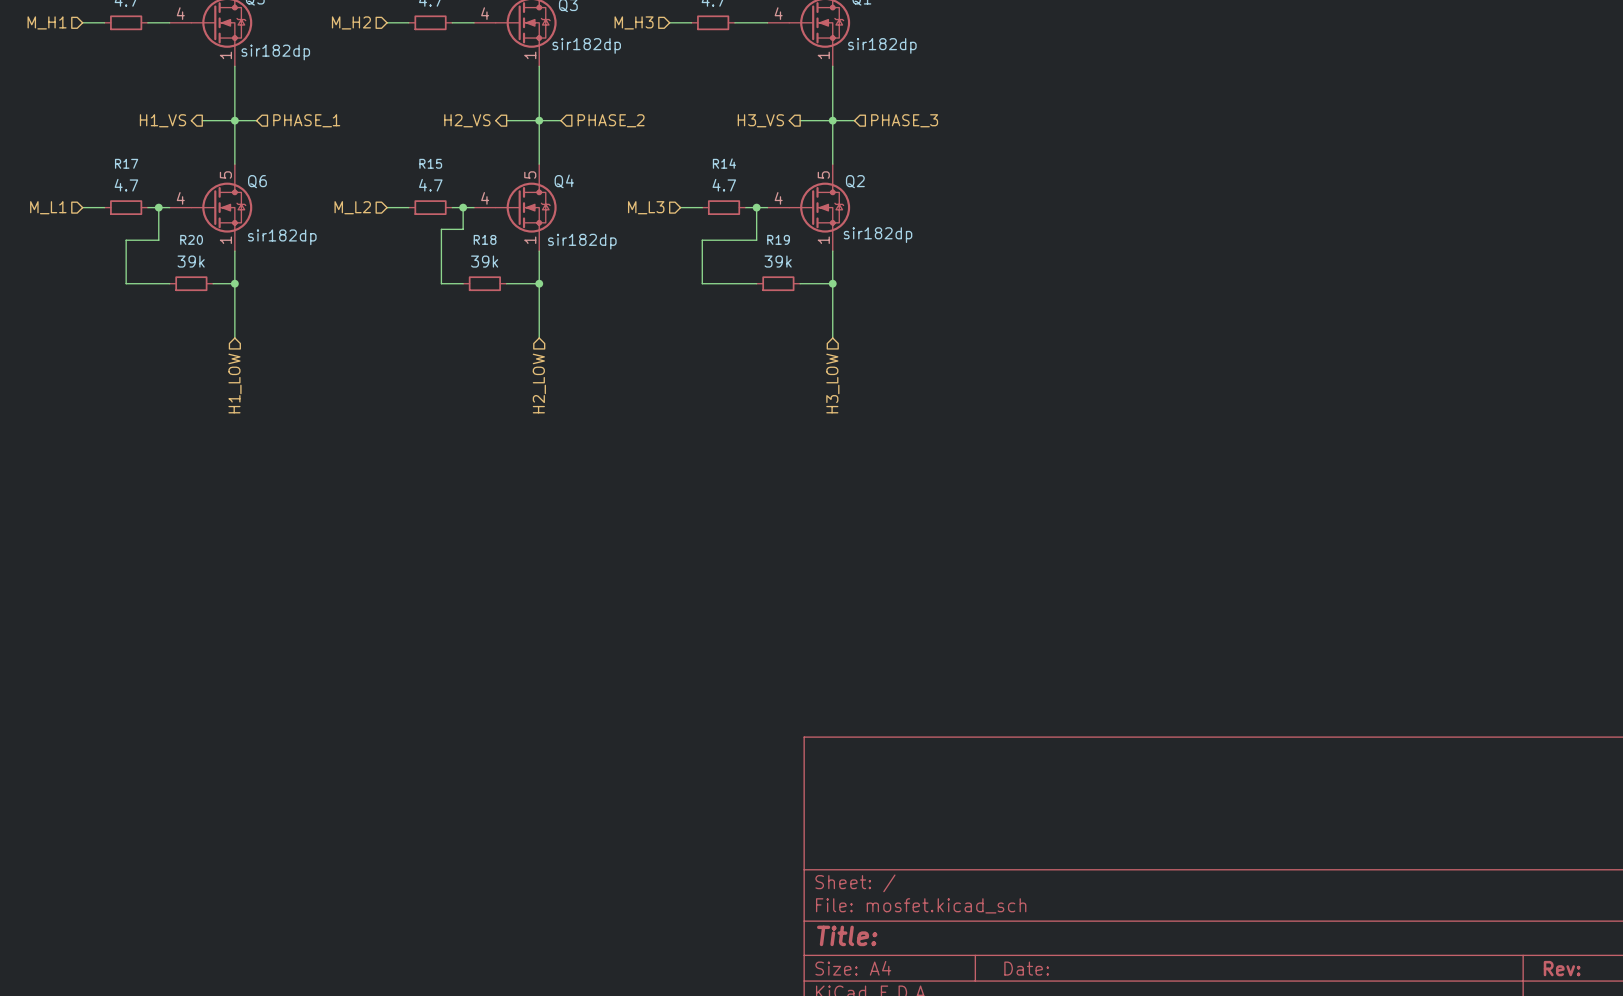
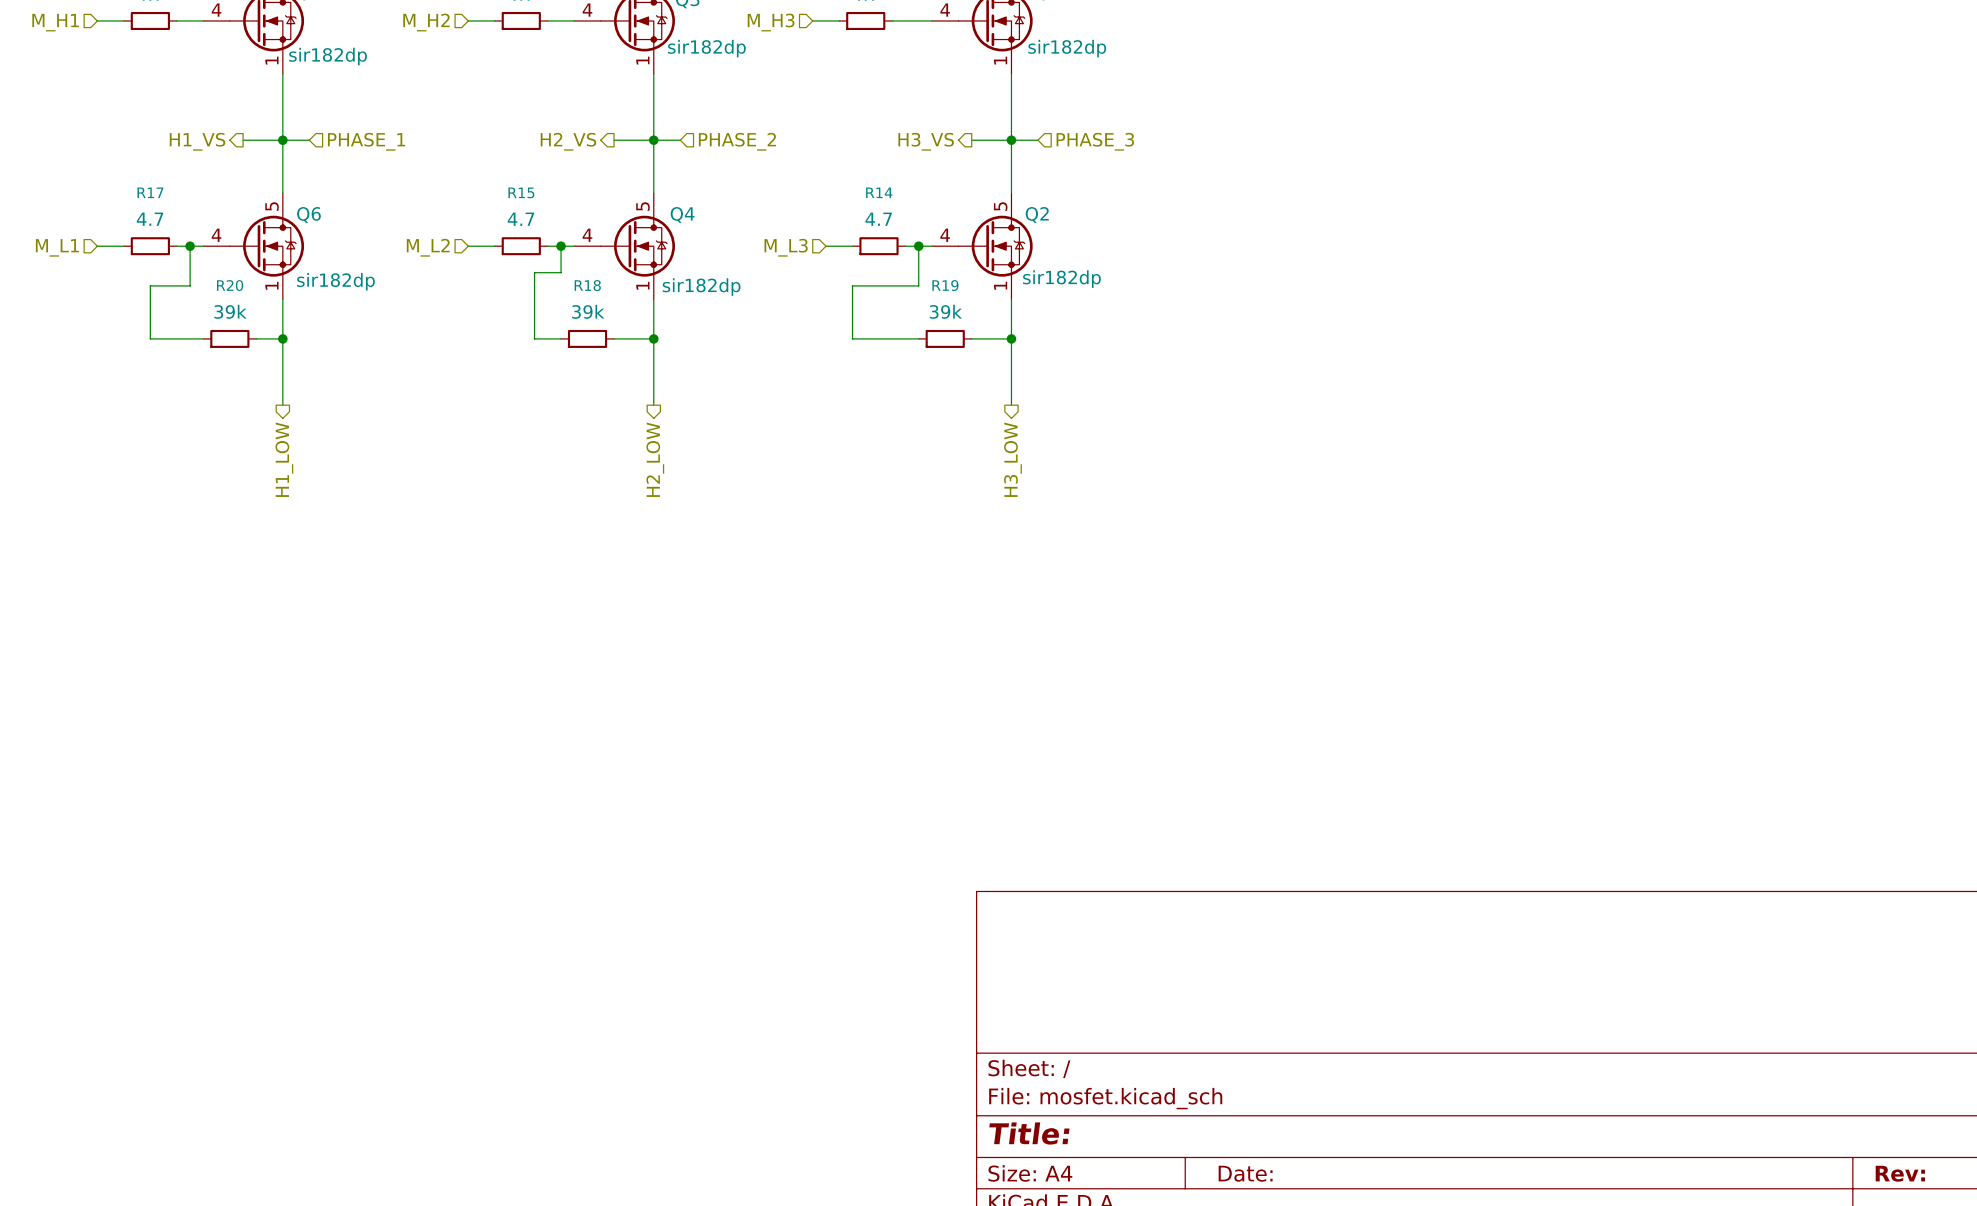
hierarchical label shape: input (234, 383) -> output (284, 459)
hierarchical label shape: input (539, 383) -> output (655, 459)
hierarchical label shape: input (832, 383) -> output (1012, 459)

